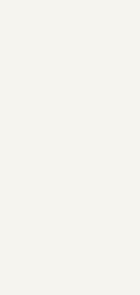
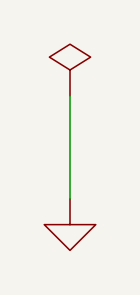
power symbol: none -> (70, 70)
wire: none -> (70, 95) (70, 198)
power symbol: none -> (70, 224)

